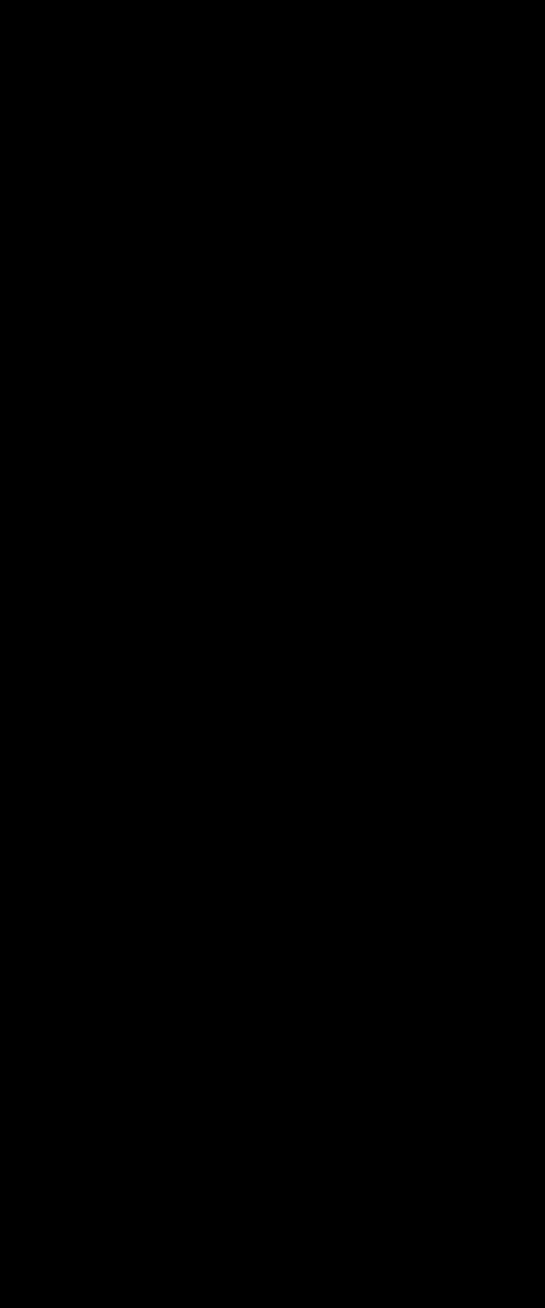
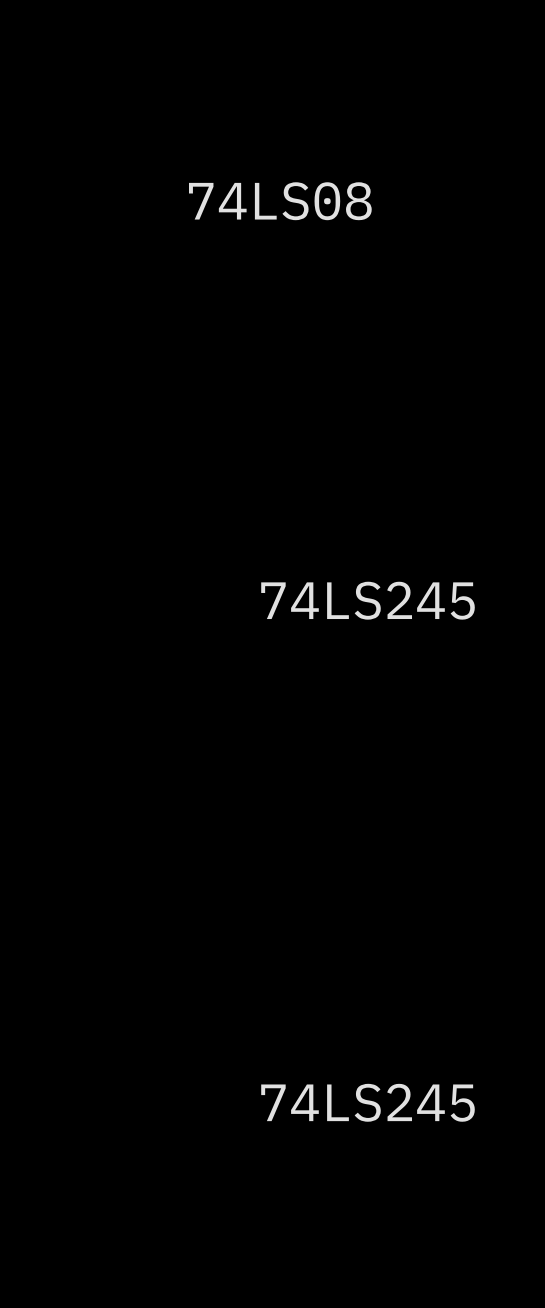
text: none -> 74LS08 (280, 201)
text: none -> 74LS245 (368, 600)
text: none -> 74LS245 (368, 1102)

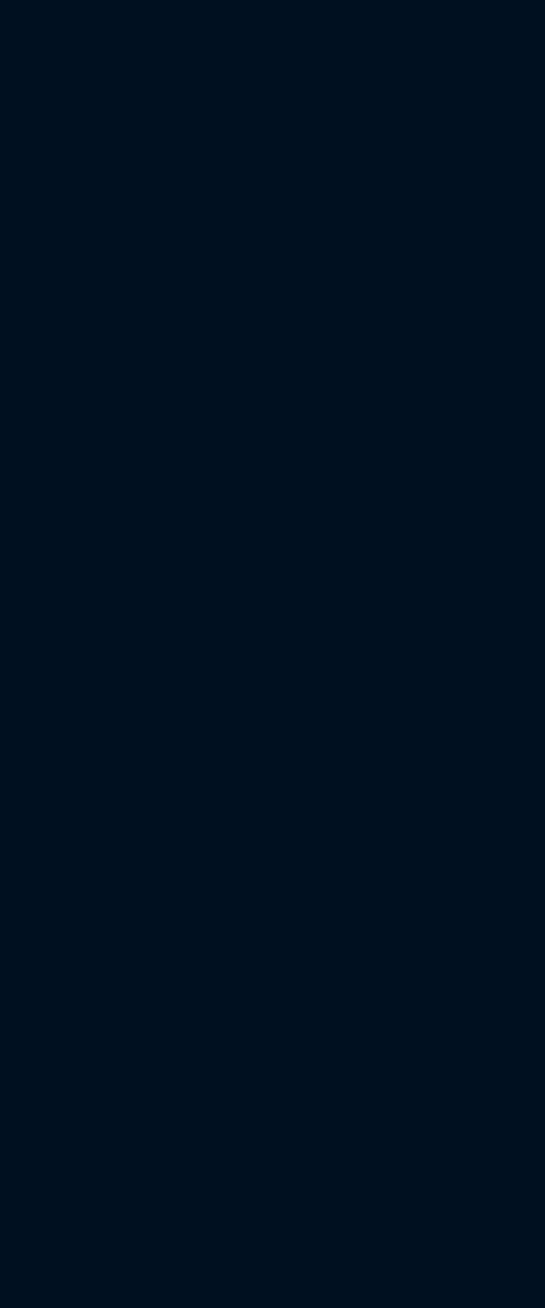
text: 74LS08 (280, 201) -> none
text: 74LS245 (368, 600) -> none
text: 74LS245 (368, 1102) -> none

